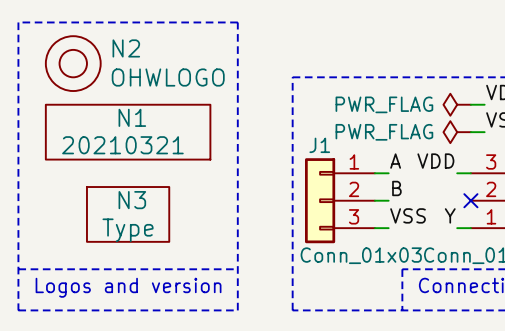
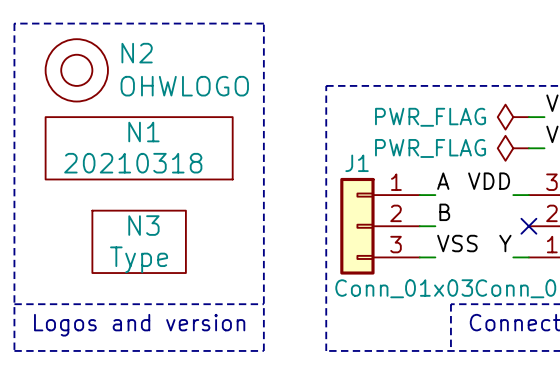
N1 value: 20210321 (122, 145) -> 20210318 (133, 163)

